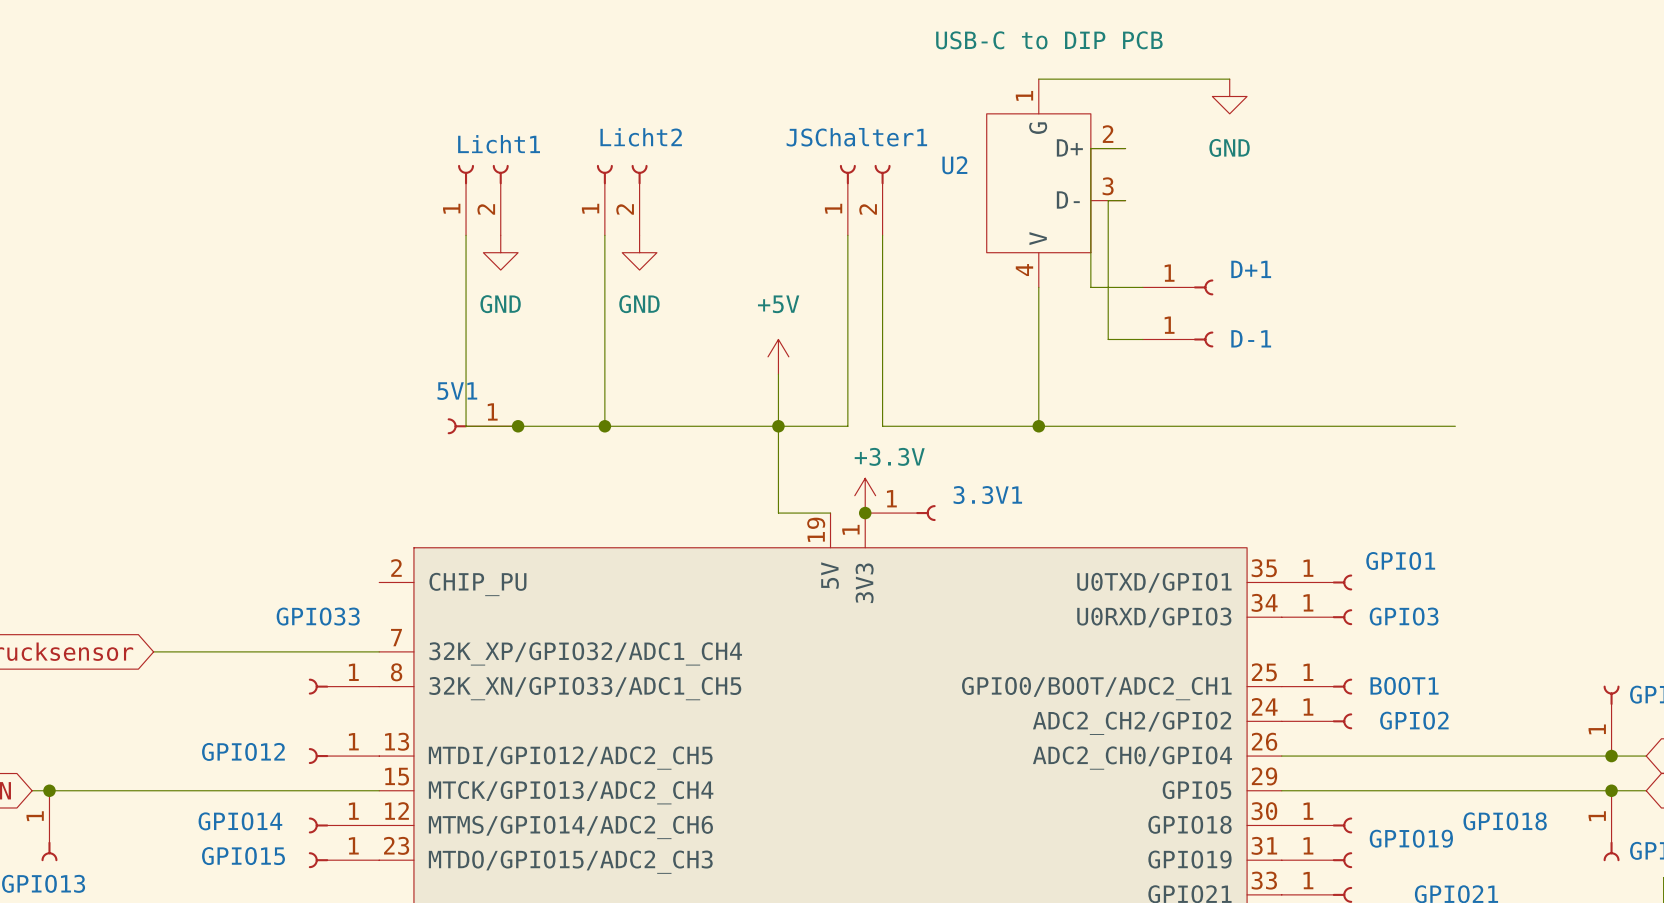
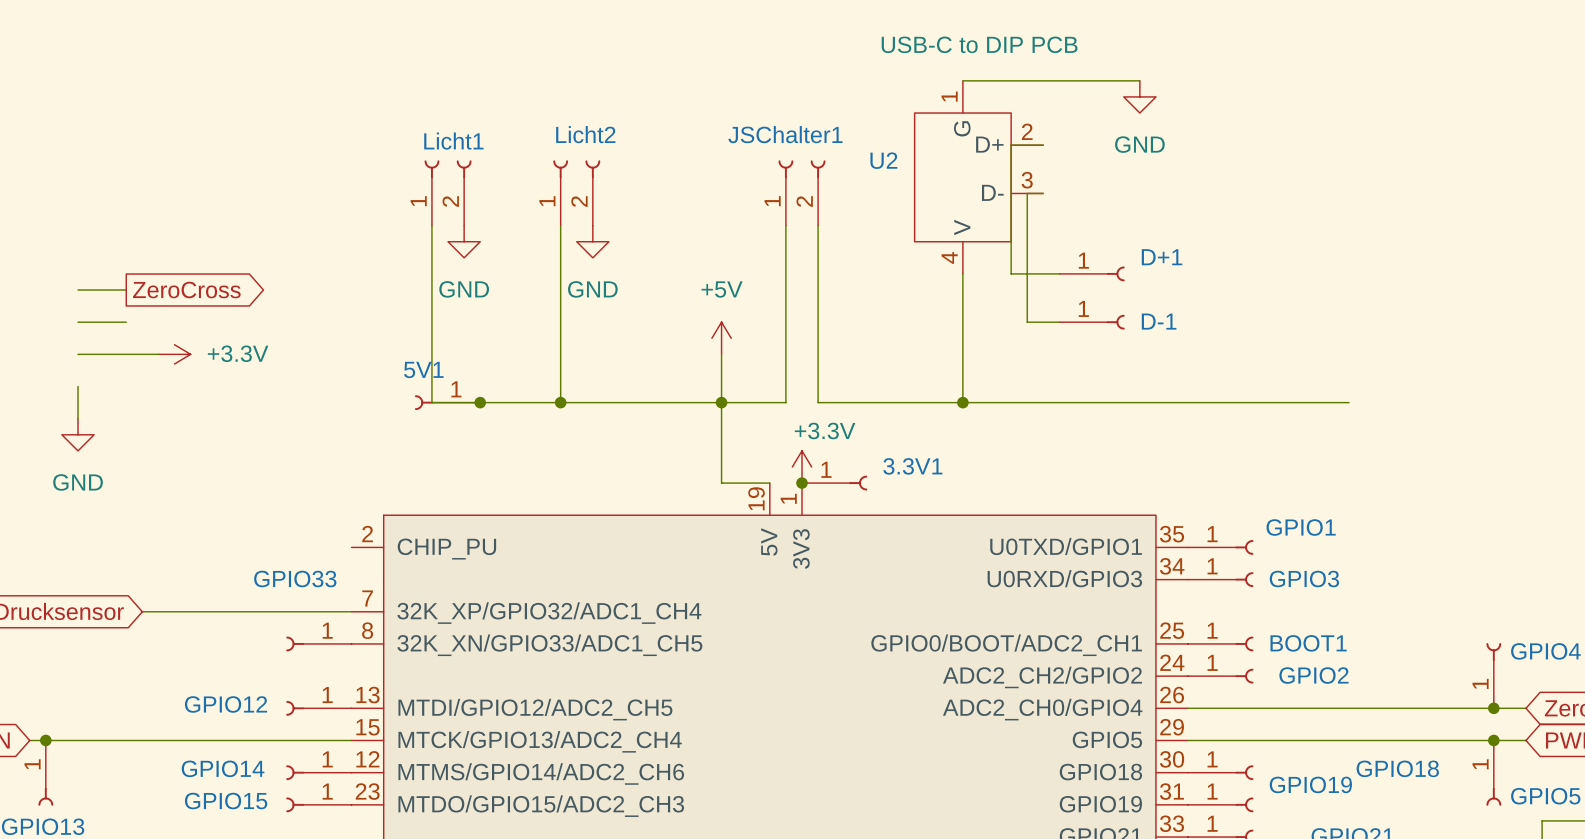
wire: none -> (78, 290) (126, 290)
global label: none -> ZeroCross (186, 290)
wire: none -> (78, 322) (126, 322)
wire: none -> (78, 354) (158, 354)
power symbol: none -> +3.3V (174, 354)
wire: none -> (78, 386) (78, 418)
power symbol: none -> GND (78, 434)

